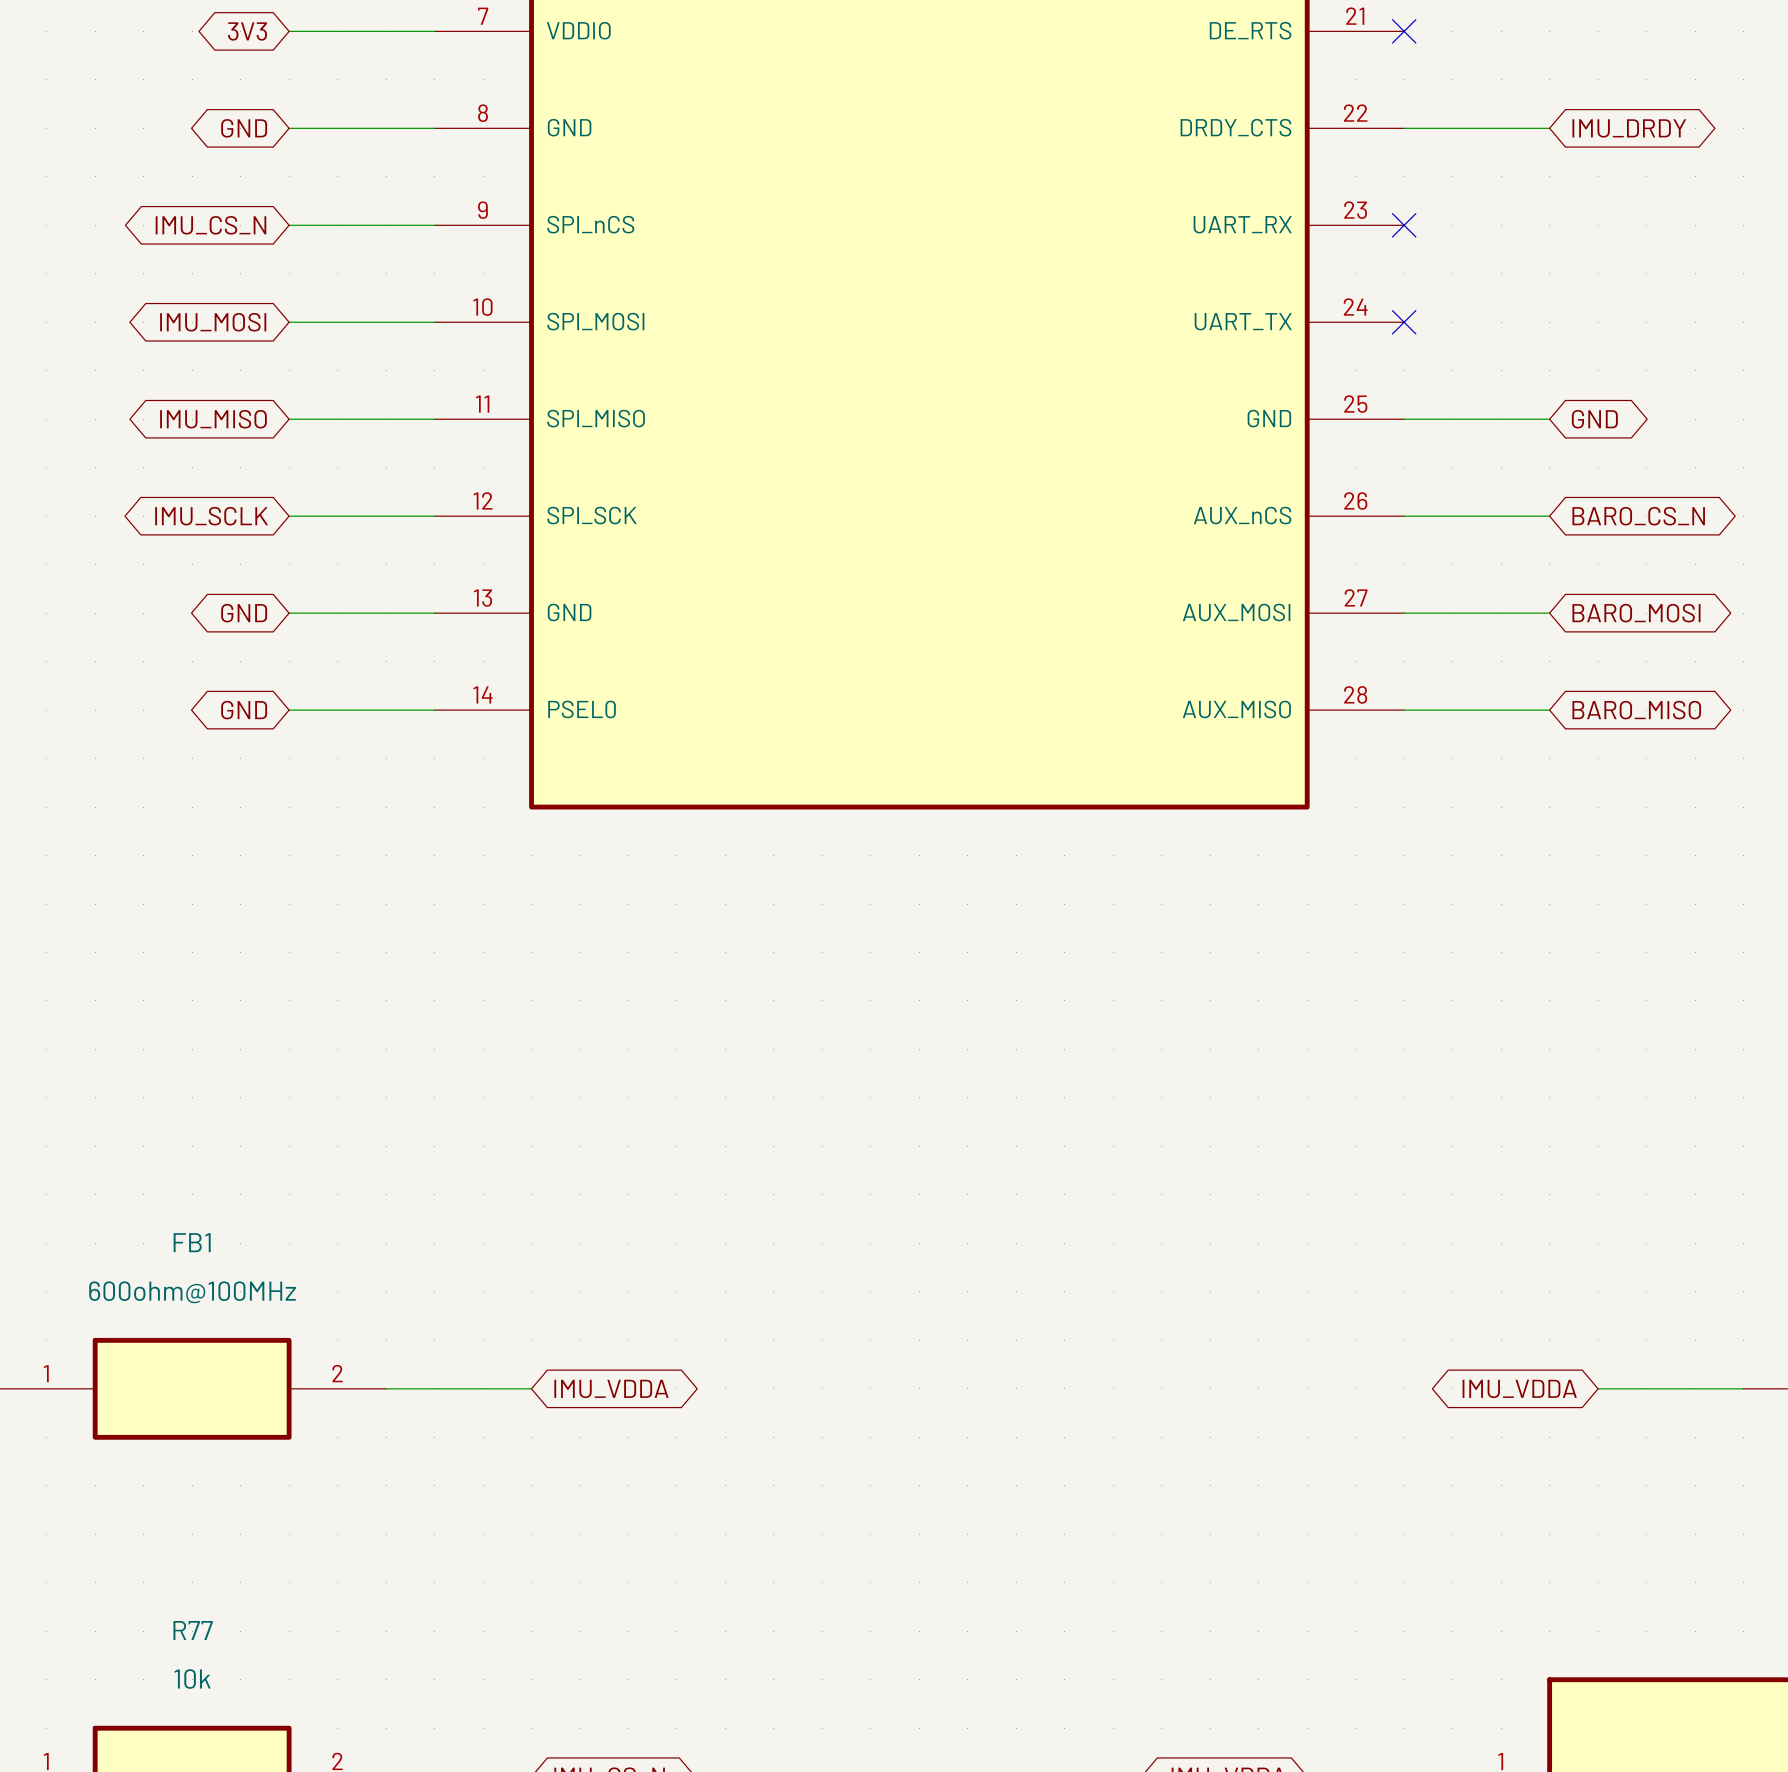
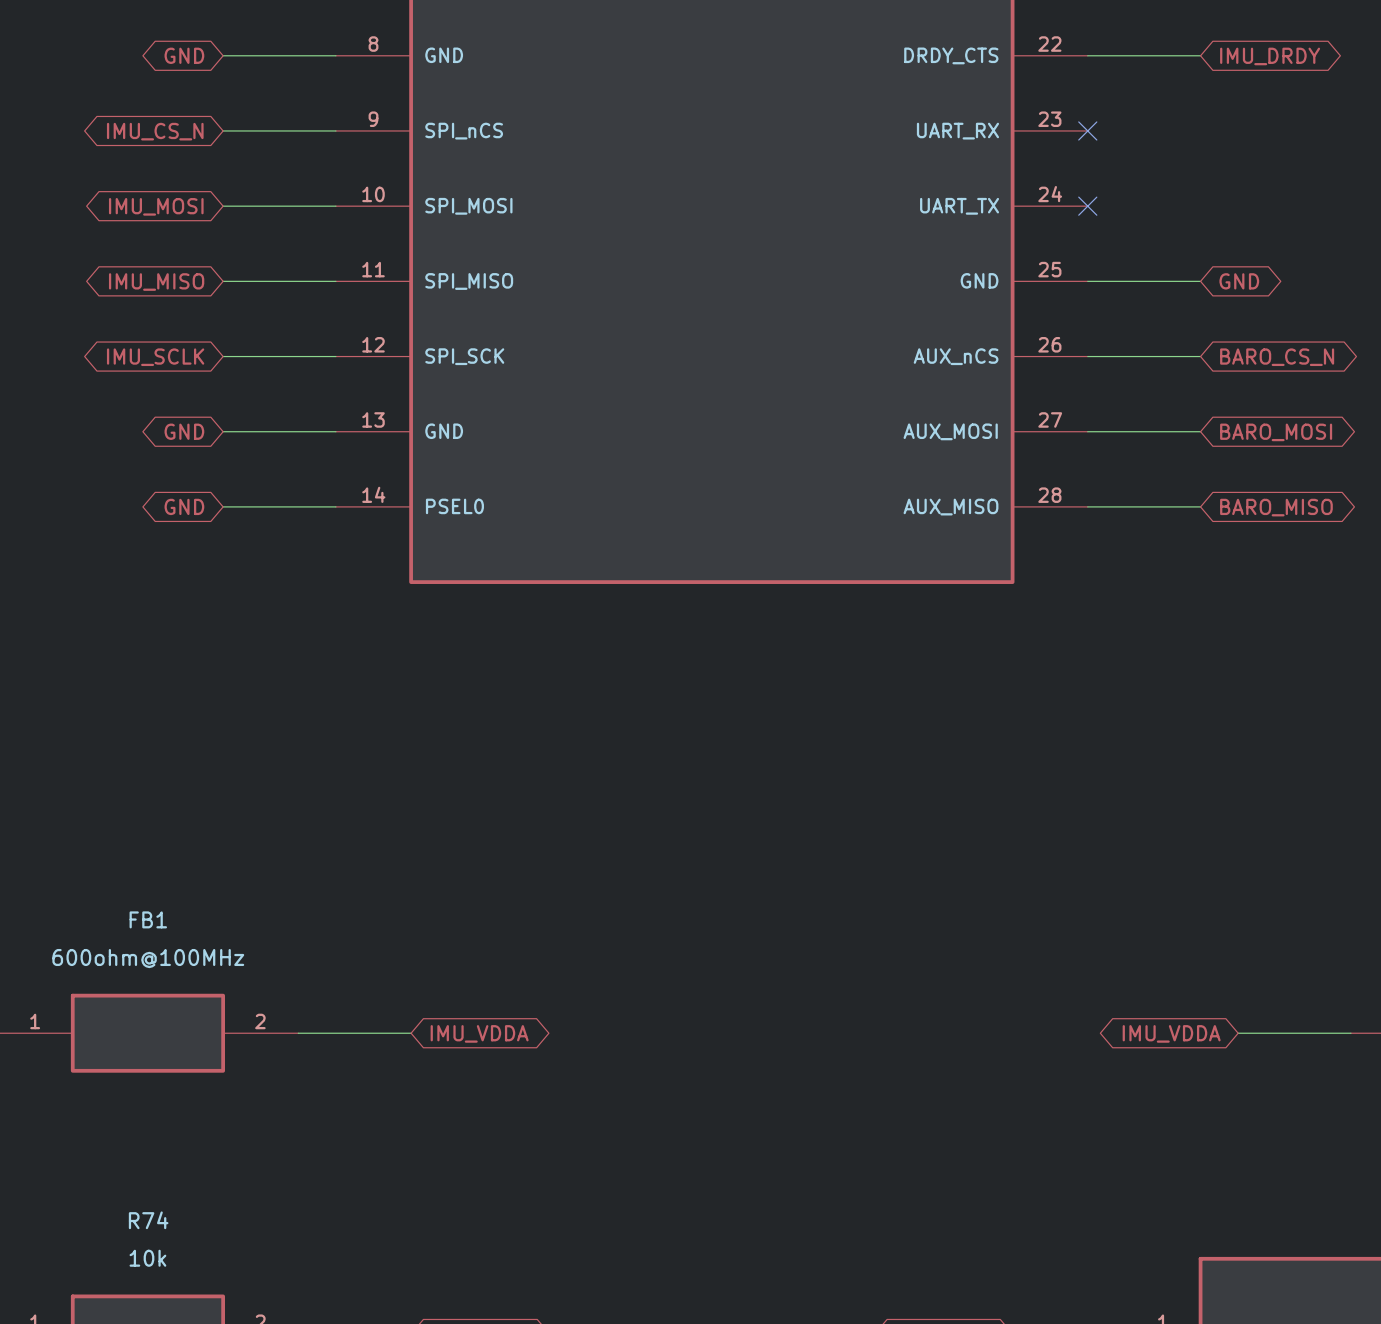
R77 name: R77 (193, 1630) -> R74 (148, 1220)

